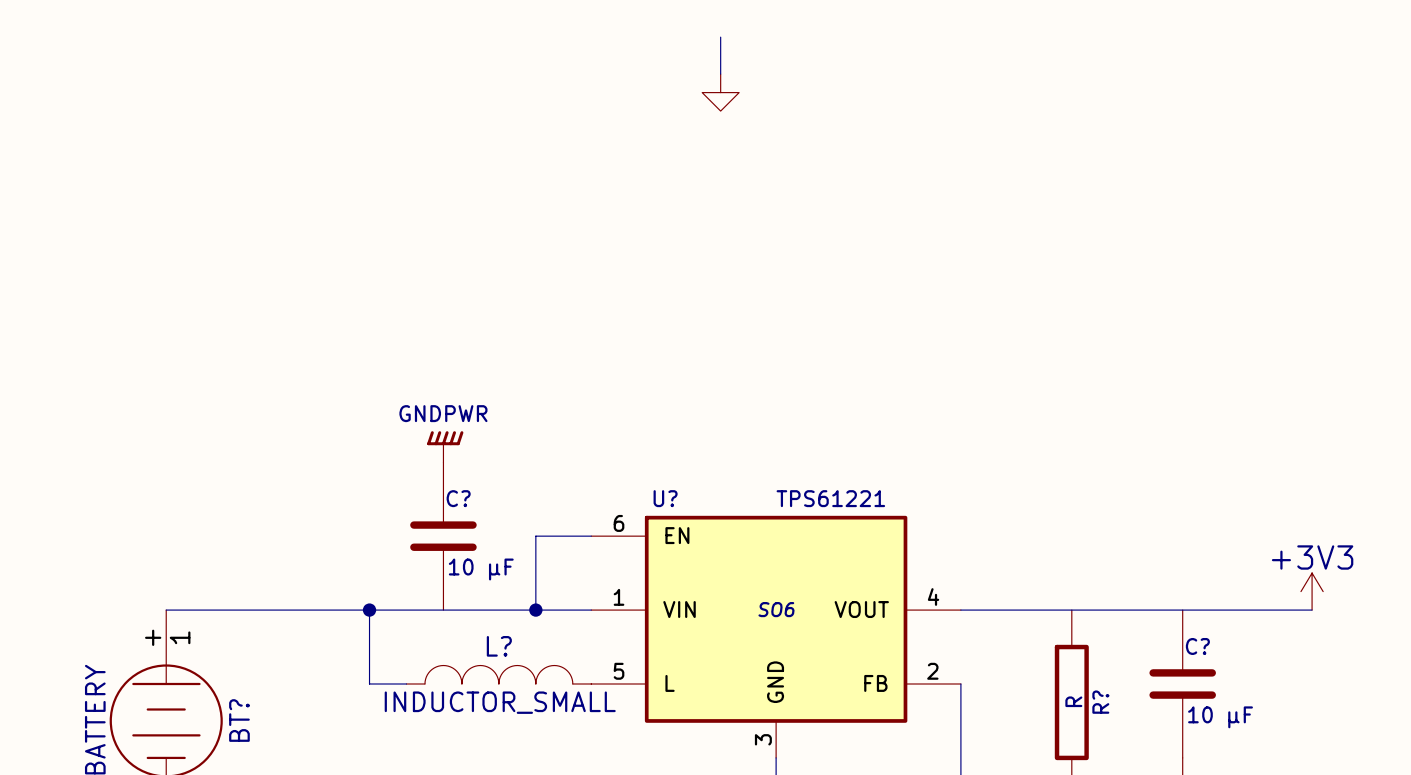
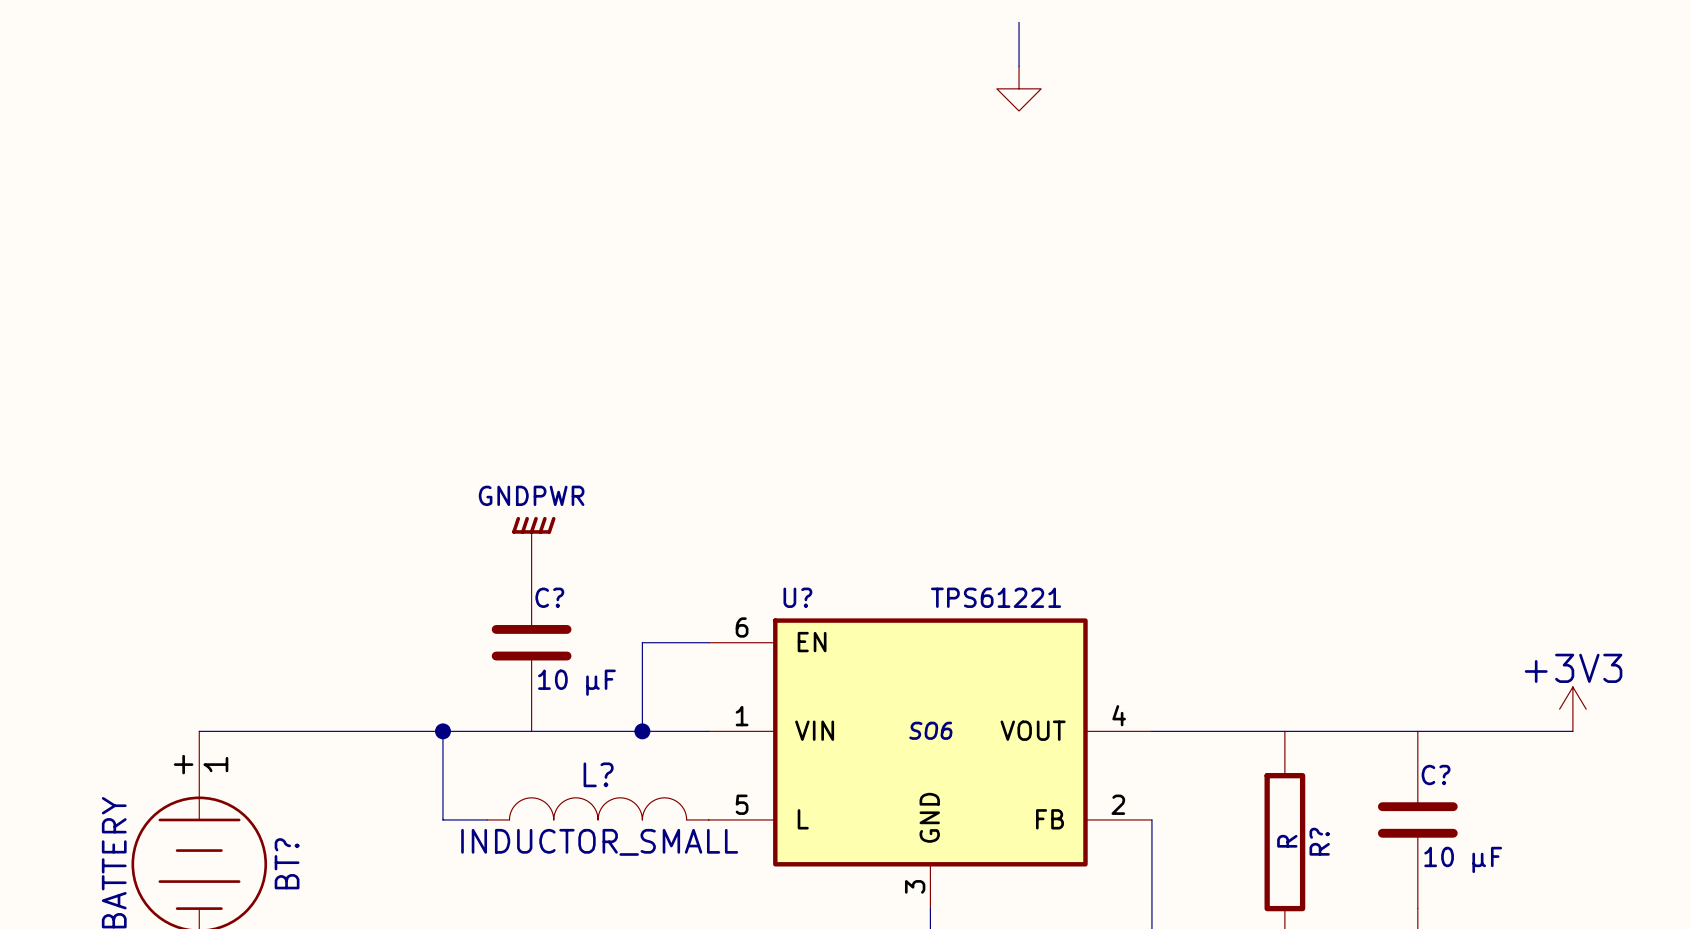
wire: (720, 37) (720, 74) -> (1019, 22) (1019, 66)
power symbol position: (720, 92) -> (1019, 88)

